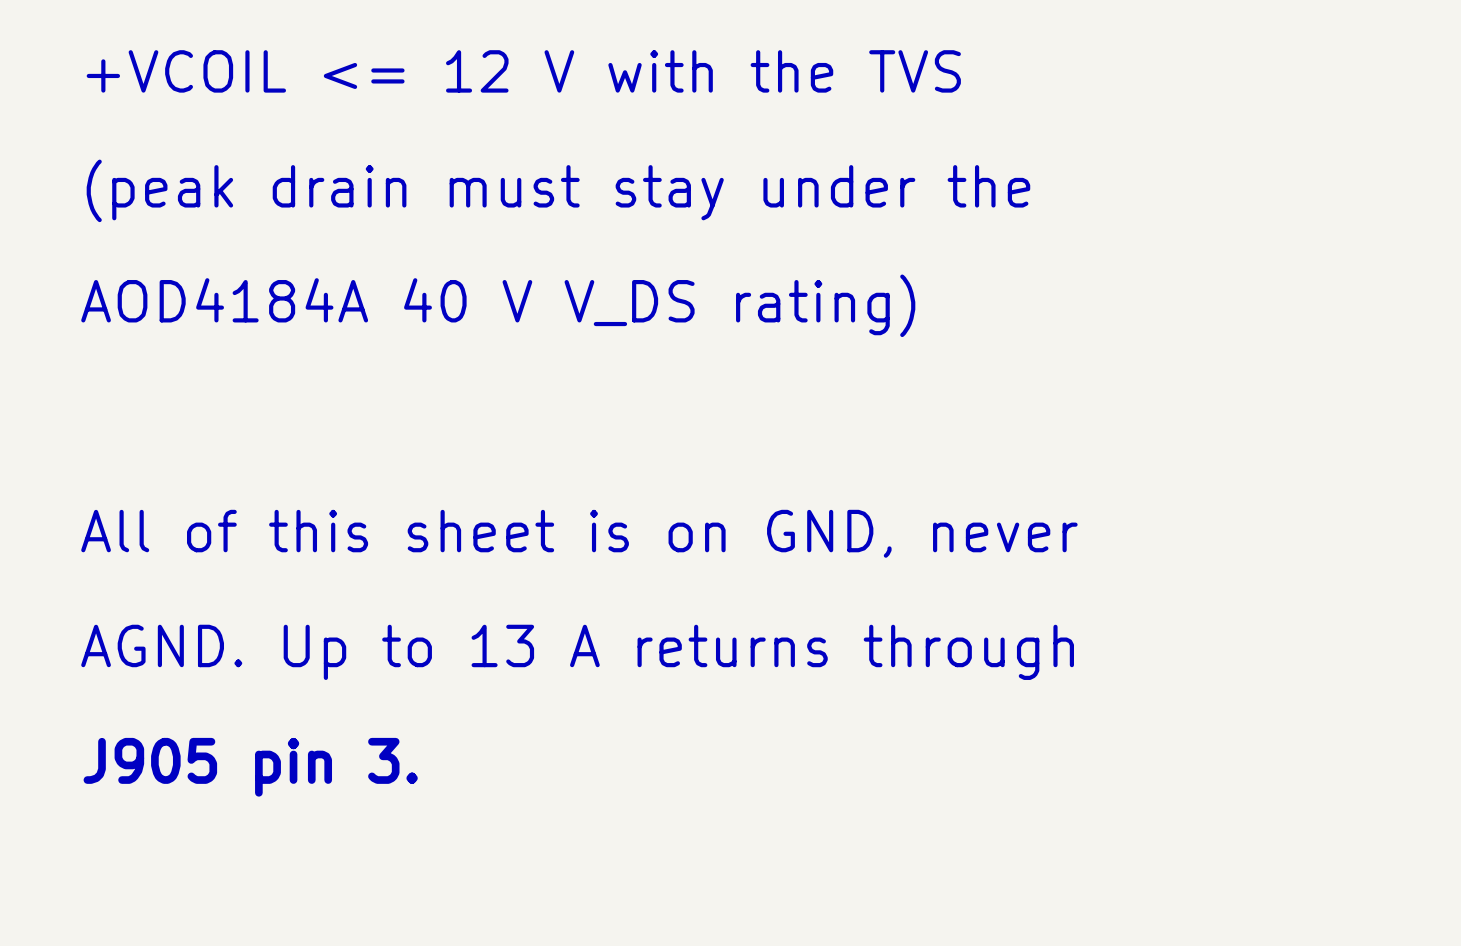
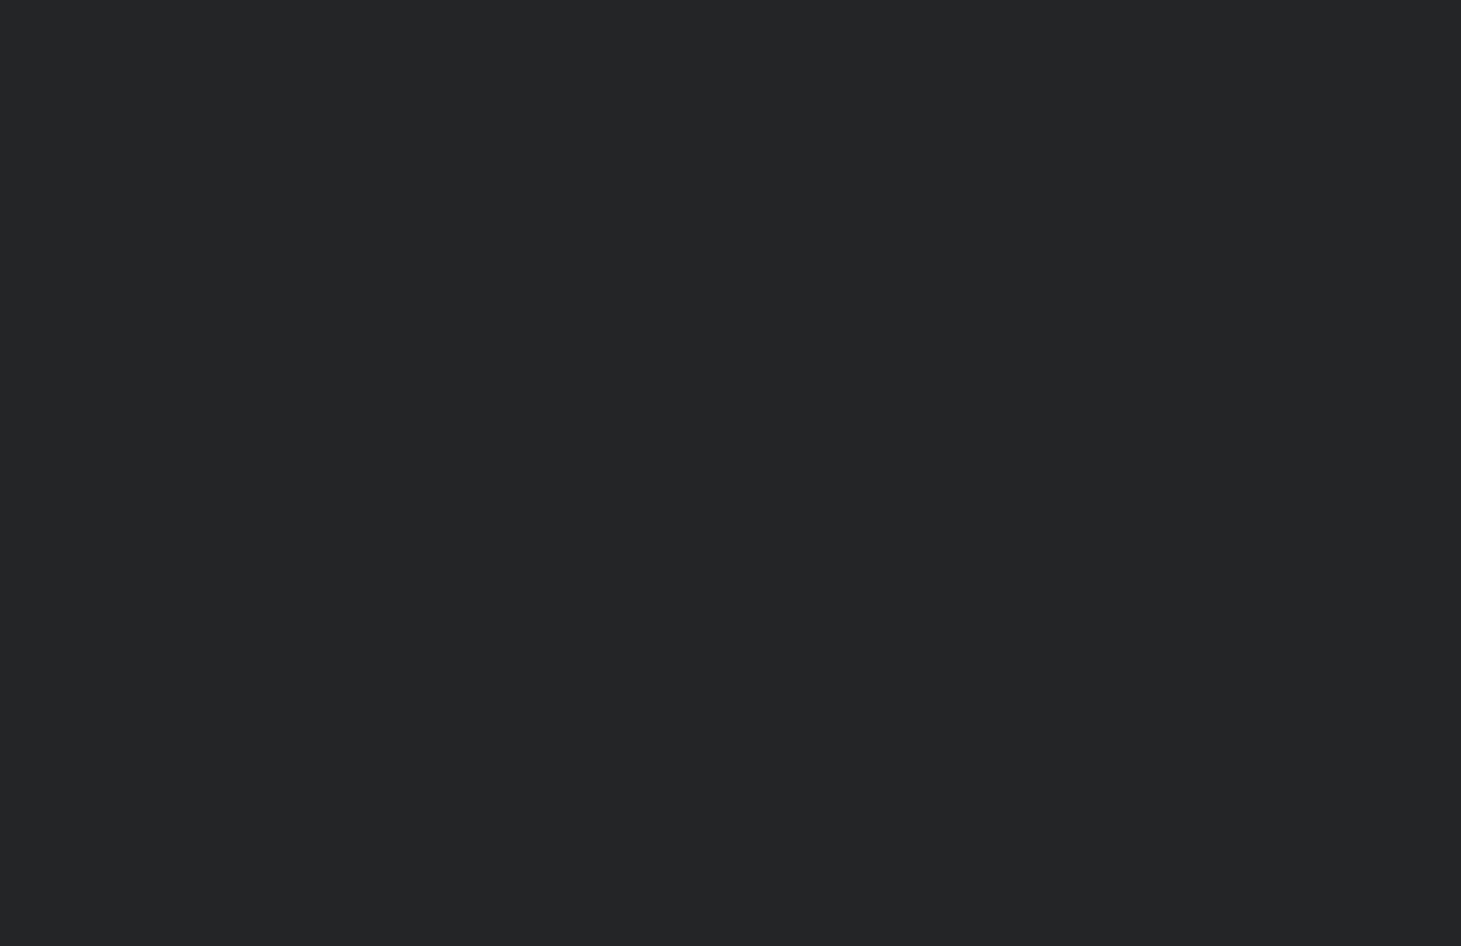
text: +VCOIL <= 12 V with the TVS (523, 71) -> none
text: (peak drain must stay under the (558, 190) -> none
text: AOD4184A 40 V V_DS rating) (498, 305) -> none
text: All of this sheet is on GND, never (579, 533) -> none
text: AGND. Up to 13 A returns through (577, 652) -> none
text: J905 pin 3. (250, 767) -> none

